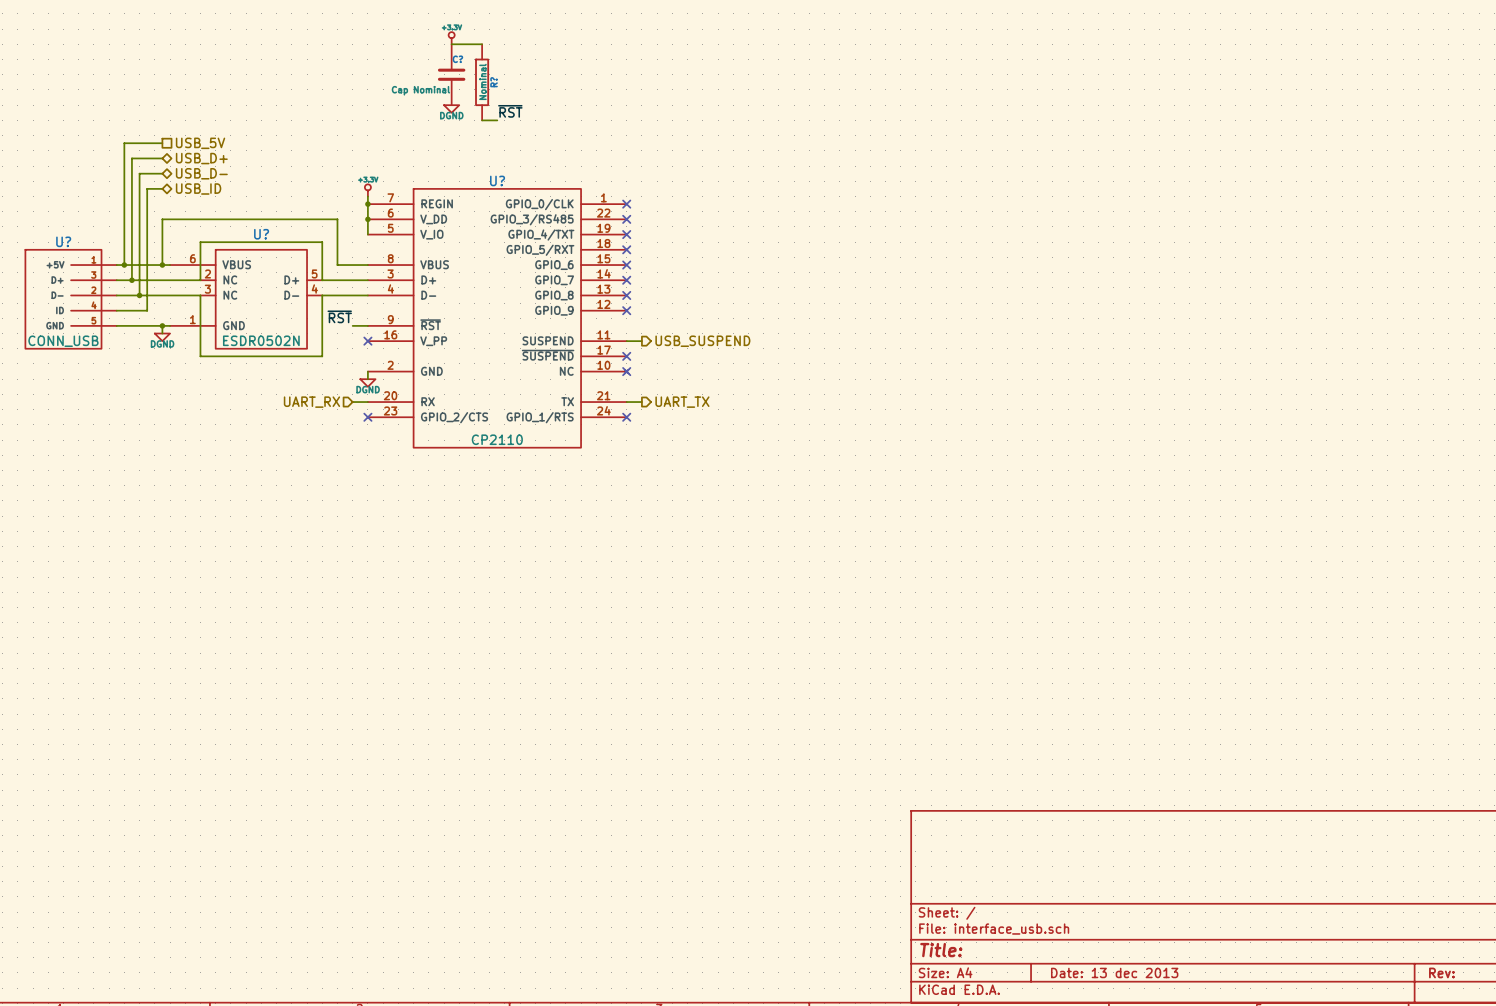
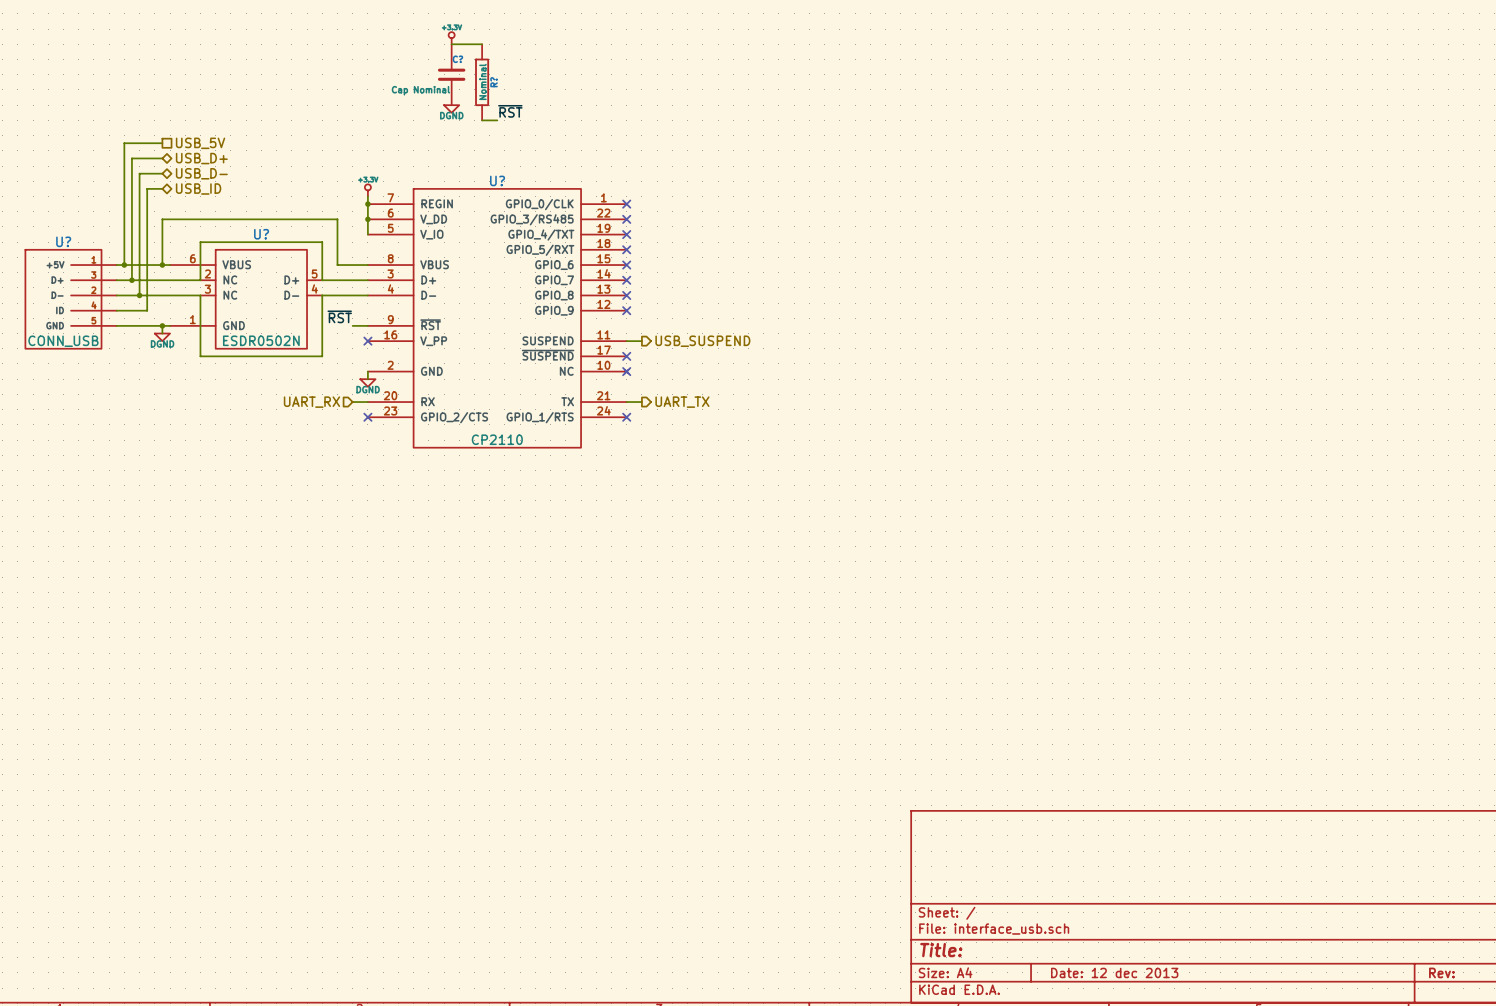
title block: Date: 13 dec 2013 (1114, 972) -> Date: 12 dec 2013 (1114, 972)

